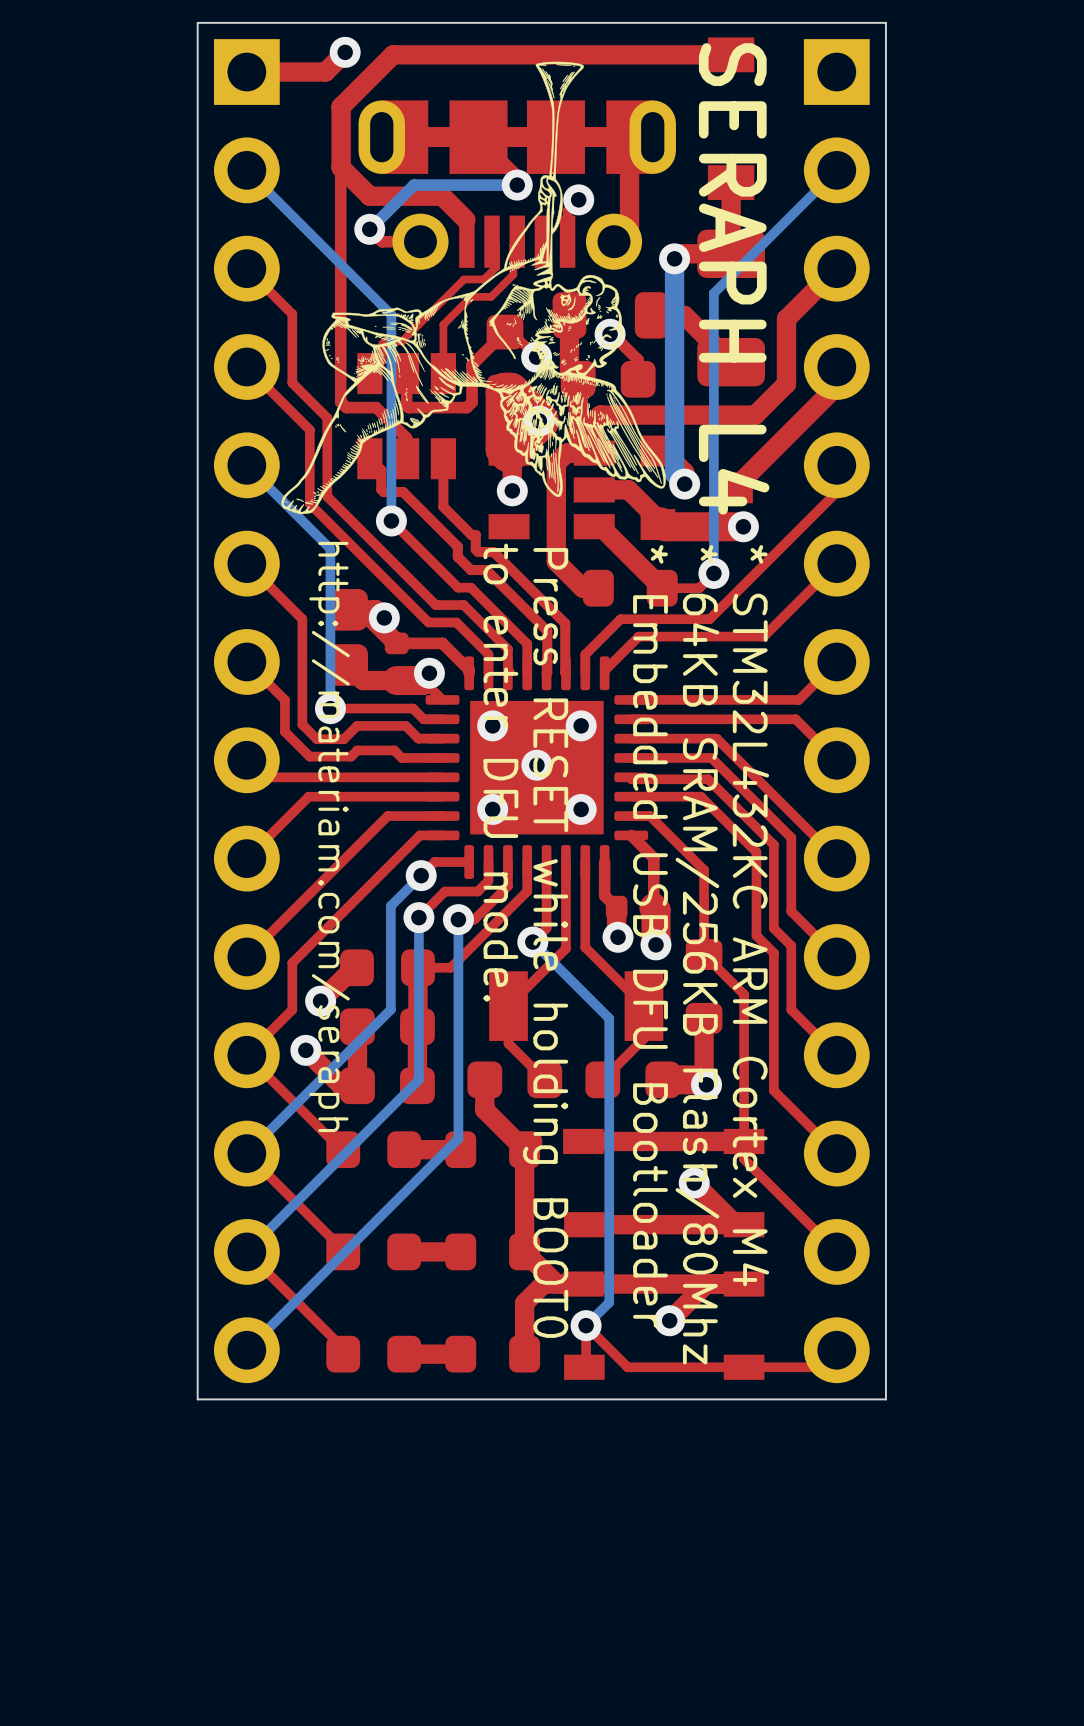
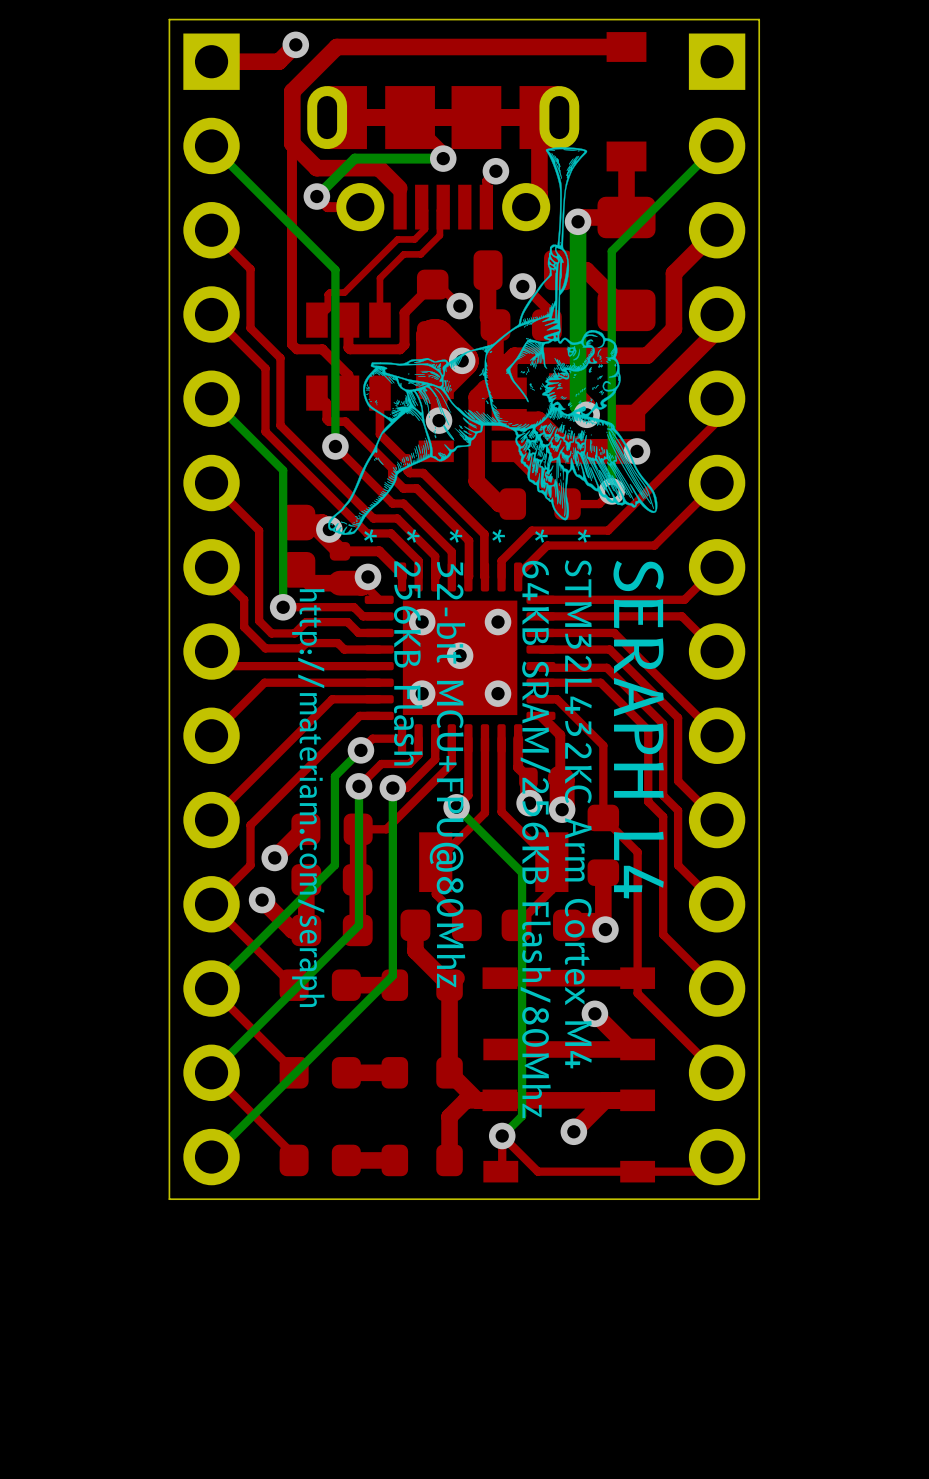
text position: SERAPH L4 (734, 278) -> SERAPH L4 (638, 729)
drawing position: (473, 287) -> (492, 341)
text: none -> * (370, 536)
text: none -> * (498, 536)
text: to enter DFU mode. (500, 772) -> none
text: none -> * 256KB Flash (408, 647)
text position: http://materiam.com/seraph (329, 836) -> http://materiam.com/seraph (308, 797)
text: * STM32L432KC ARM Cortex M4 (750, 915) -> none
text: * Embedded USB DFU Bootloader (650, 936) -> none
text: none -> * 32-bit MCU+FPU@80Mhz (447, 758)
text: Press RESET while holding BOOT0 (545, 942) -> none
text position: * 64KB SRAM/256KB Flash/80Mhz (697, 954) -> * 64KB SRAM/256KB Flash/80Mhz (535, 823)
text: none -> * STM32L432KC Arm Cortex M4 (578, 798)

